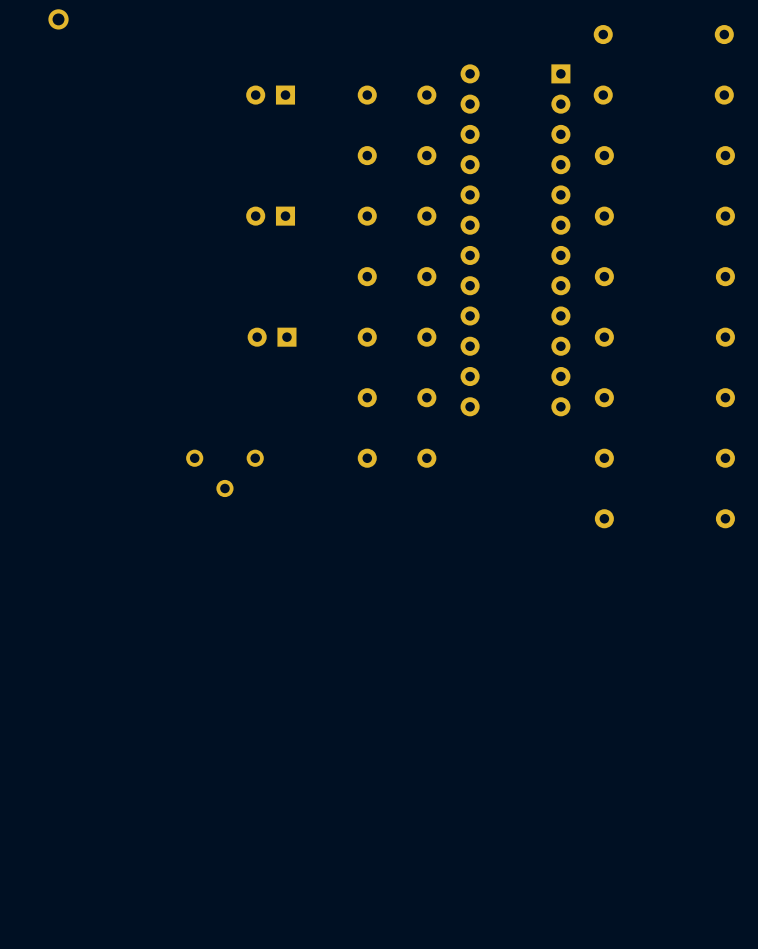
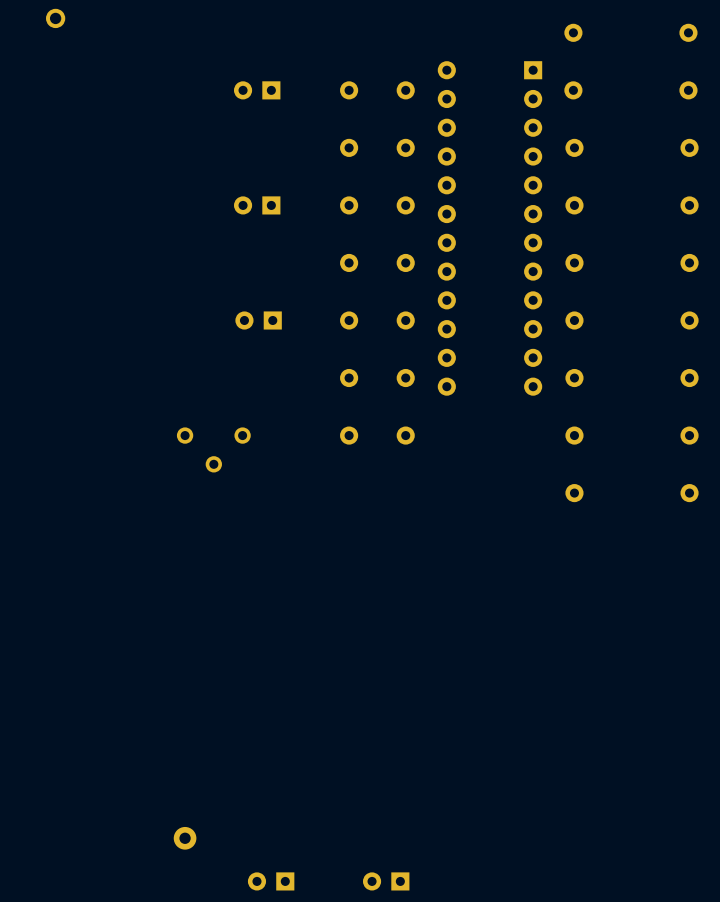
part: none -> (185, 838)
part: none -> (271, 881)
part: none -> (386, 881)

